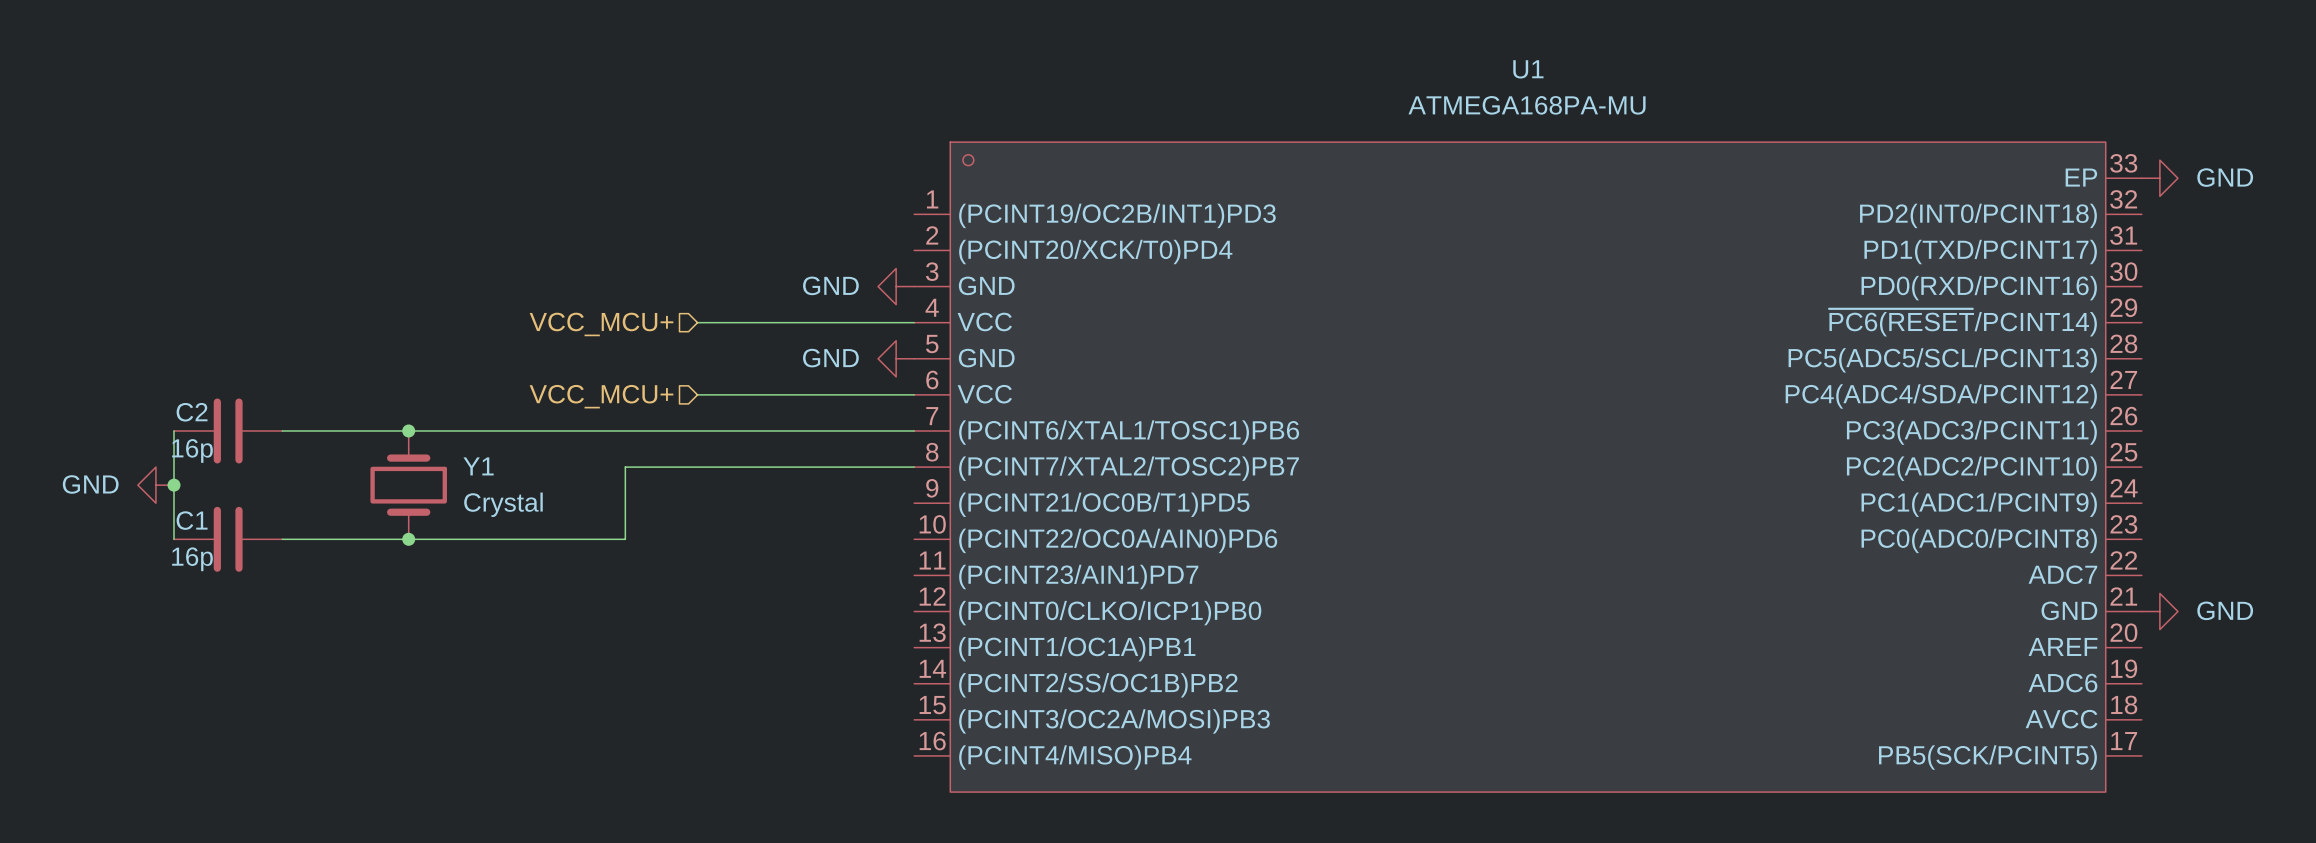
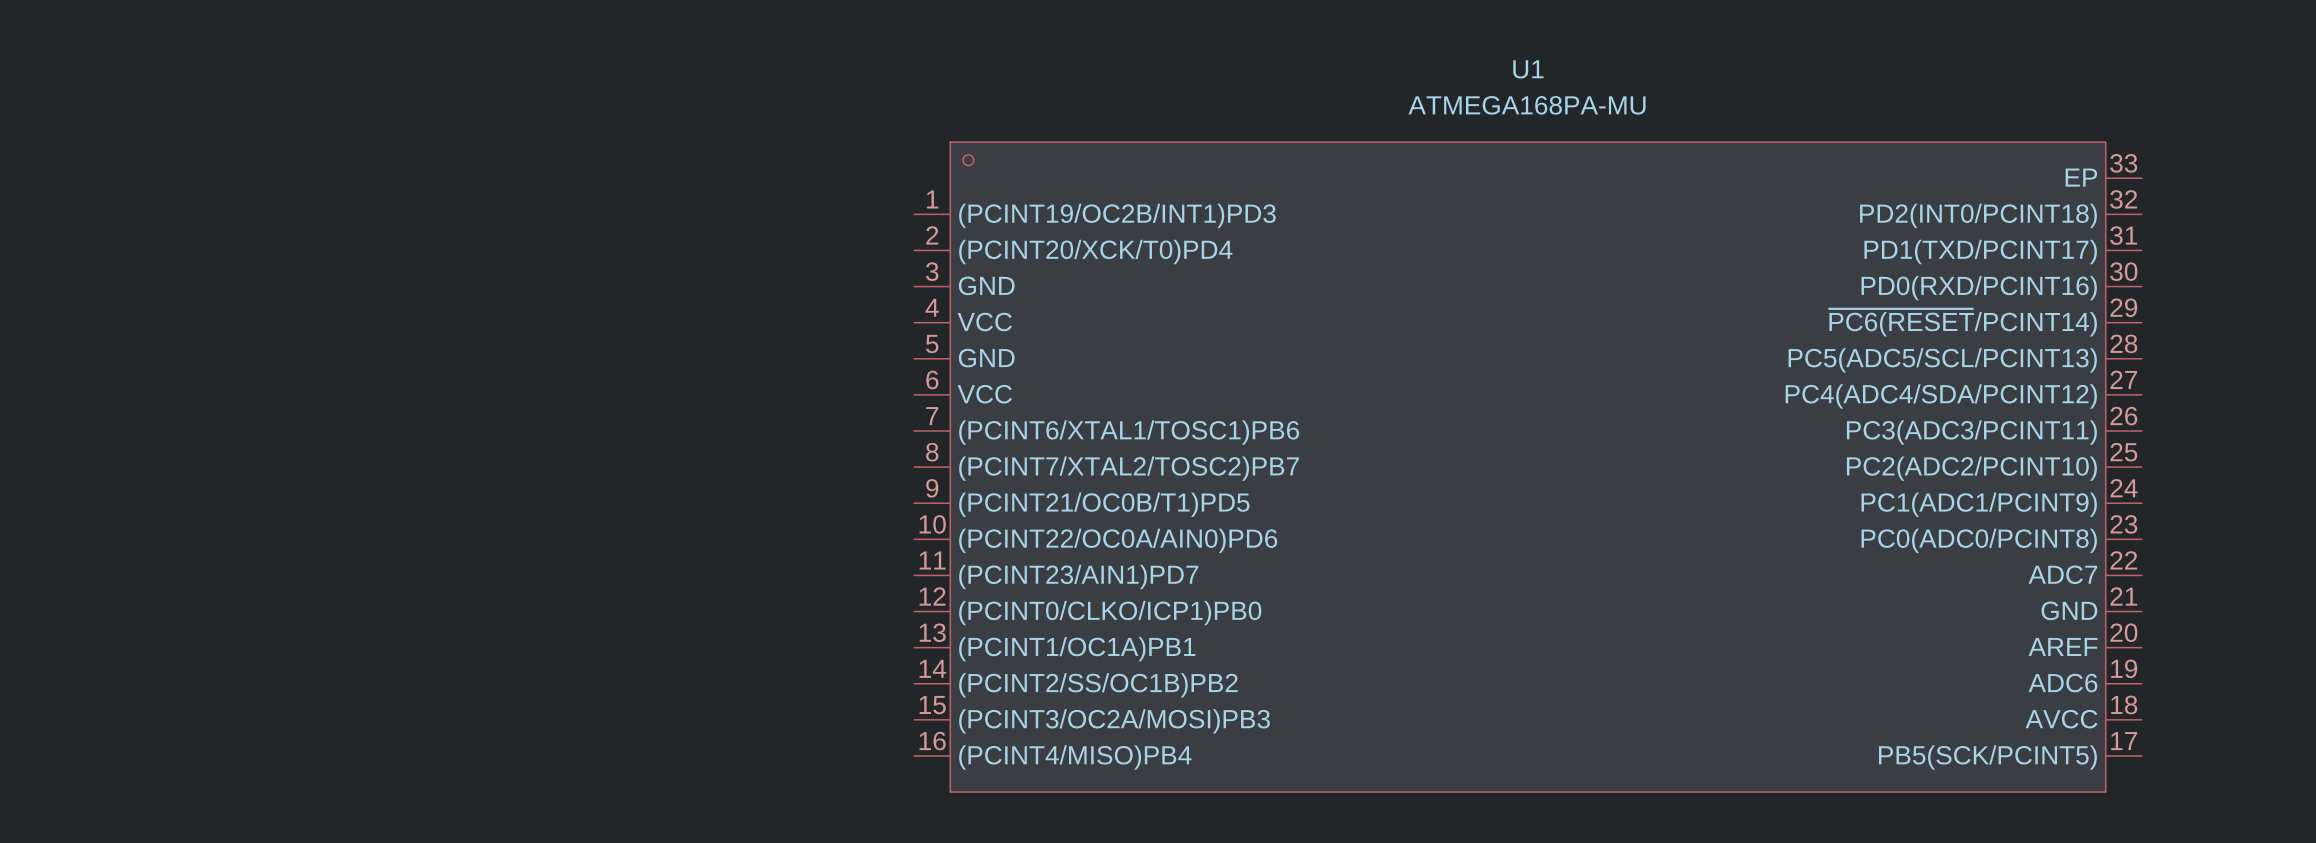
power symbol: GND (2159, 178) -> none
power symbol: GND (896, 286) -> none
wire: (697, 322) (914, 322) -> none
hierarchical label: VCC_MCU+ (601, 324) -> none
power symbol: GND (896, 358) -> none
wire: (697, 394) (914, 394) -> none
hierarchical label: VCC_MCU+ (601, 396) -> none
wire: (174, 430) (174, 539) -> none
C2: 16p (228, 430) -> none
wire: (282, 430) (914, 430) -> none
junction: (408, 430) -> none
wire: (914, 467) (625, 467) (625, 539) (282, 539) -> none
power symbol: GND (155, 485) -> none
junction: (174, 485) -> none
Y1: Crystal (408, 485) -> none
C1: 16p (228, 539) -> none
junction: (408, 539) -> none
power symbol: GND (2159, 611) -> none

